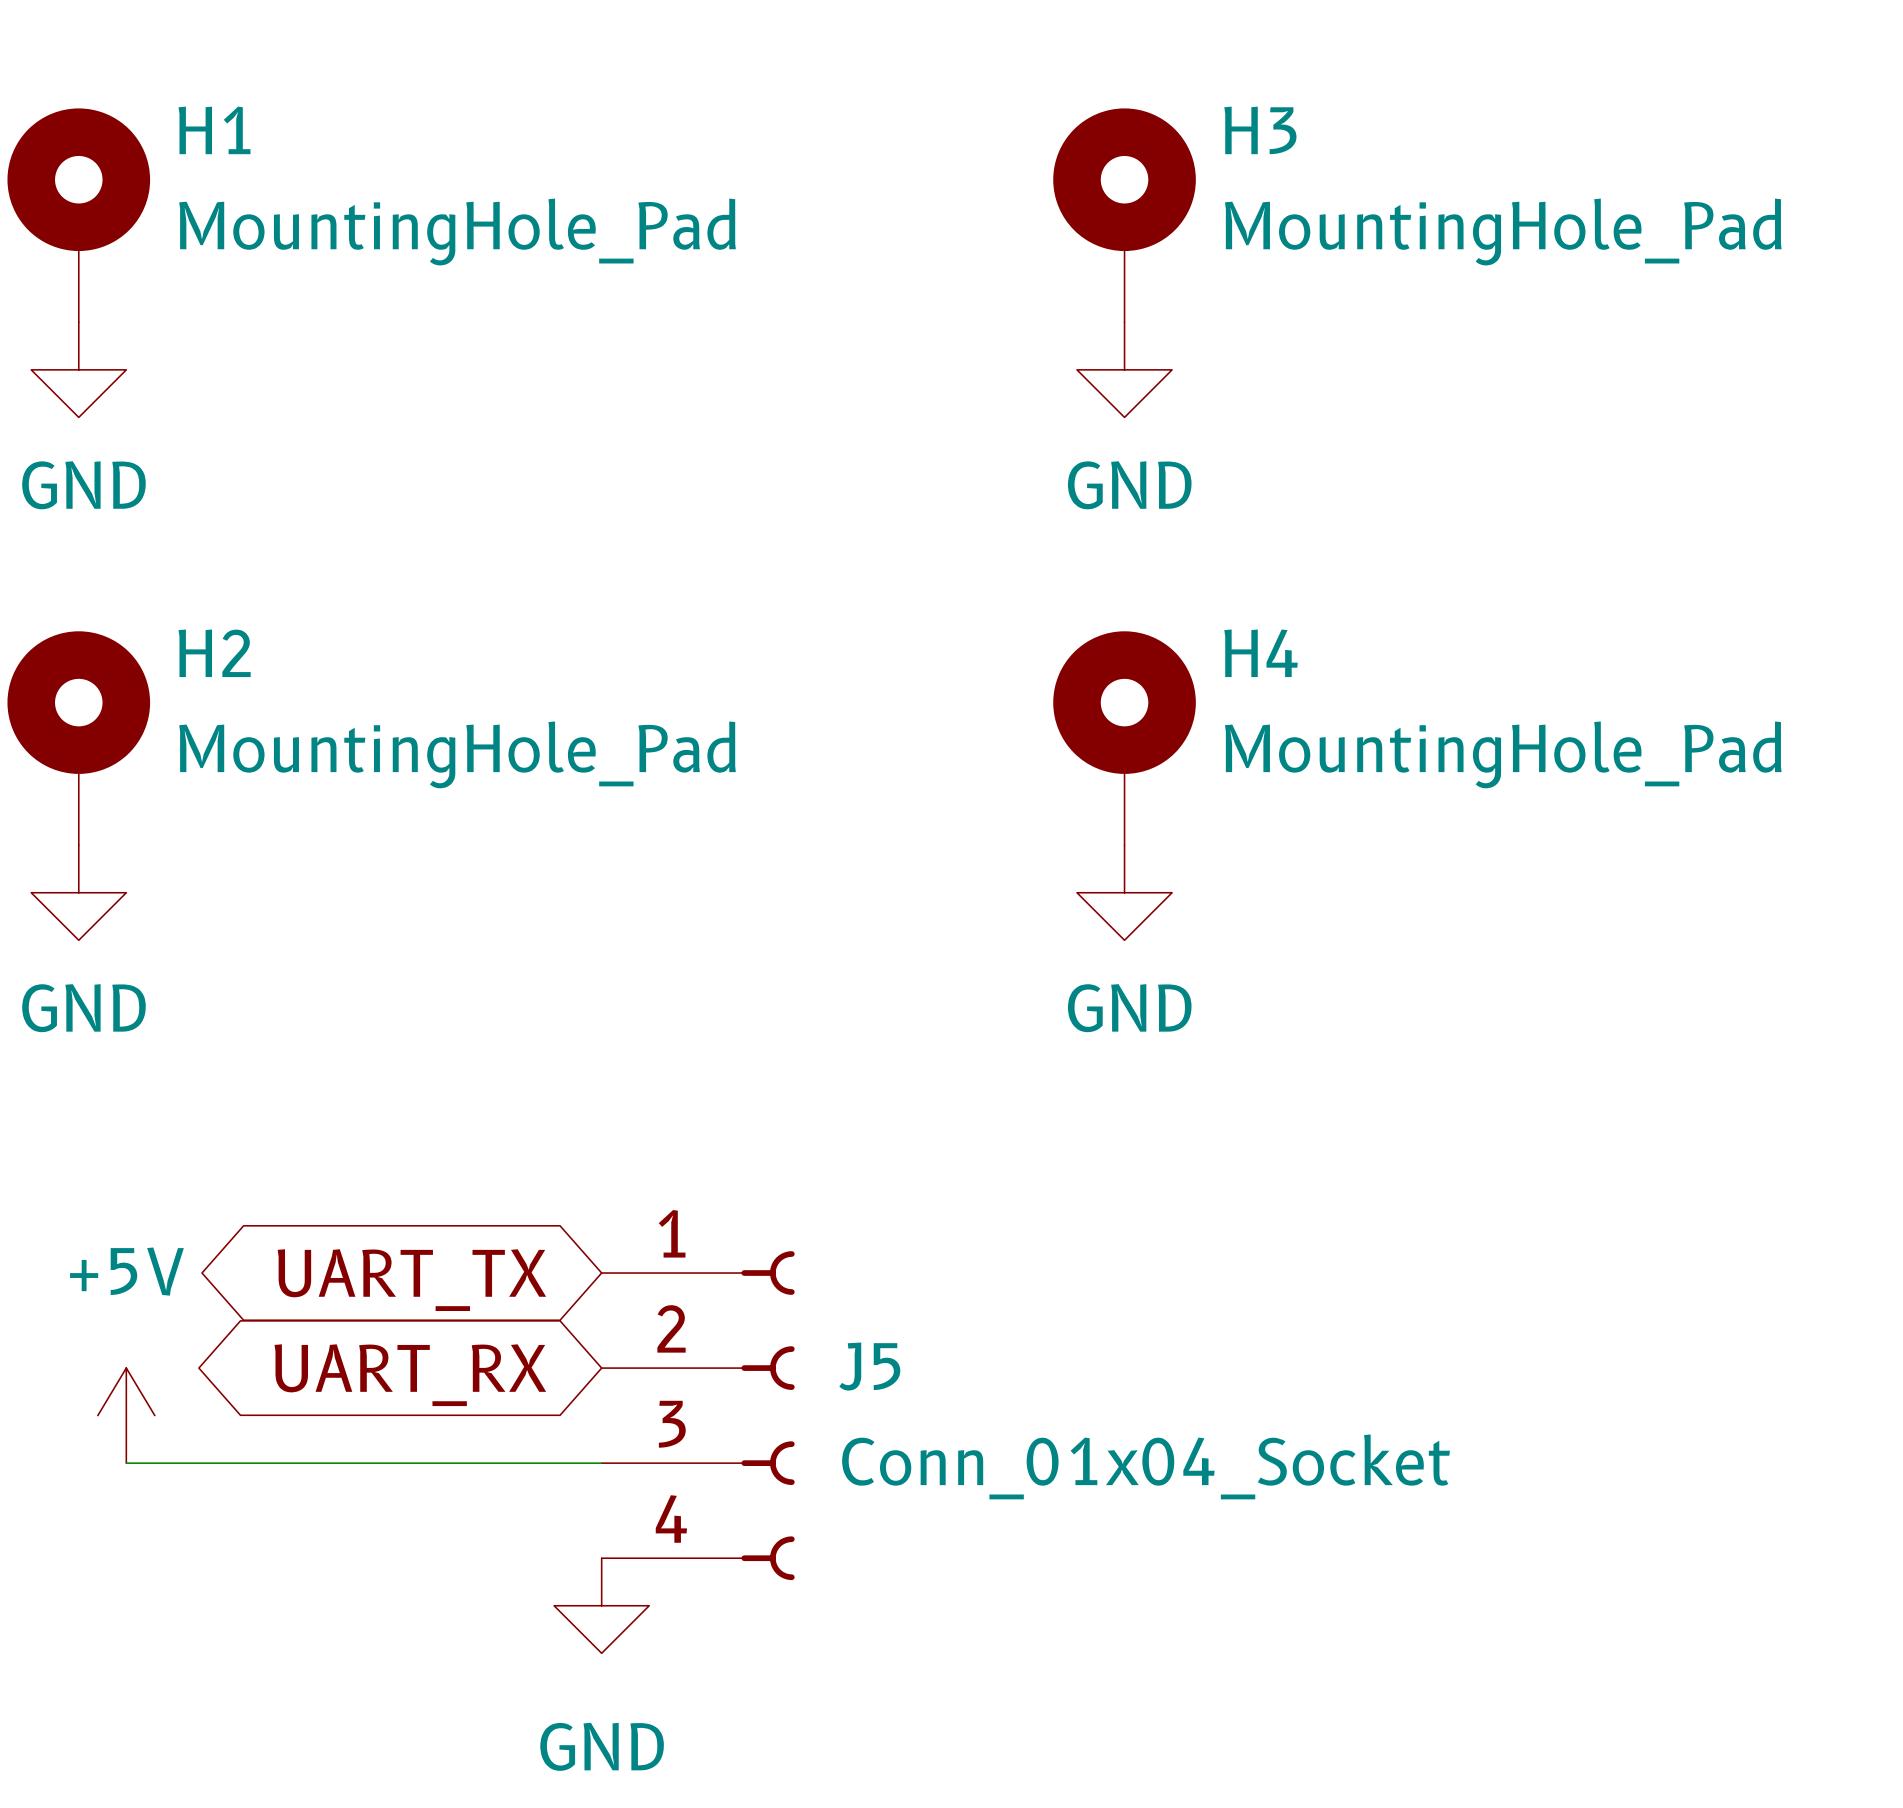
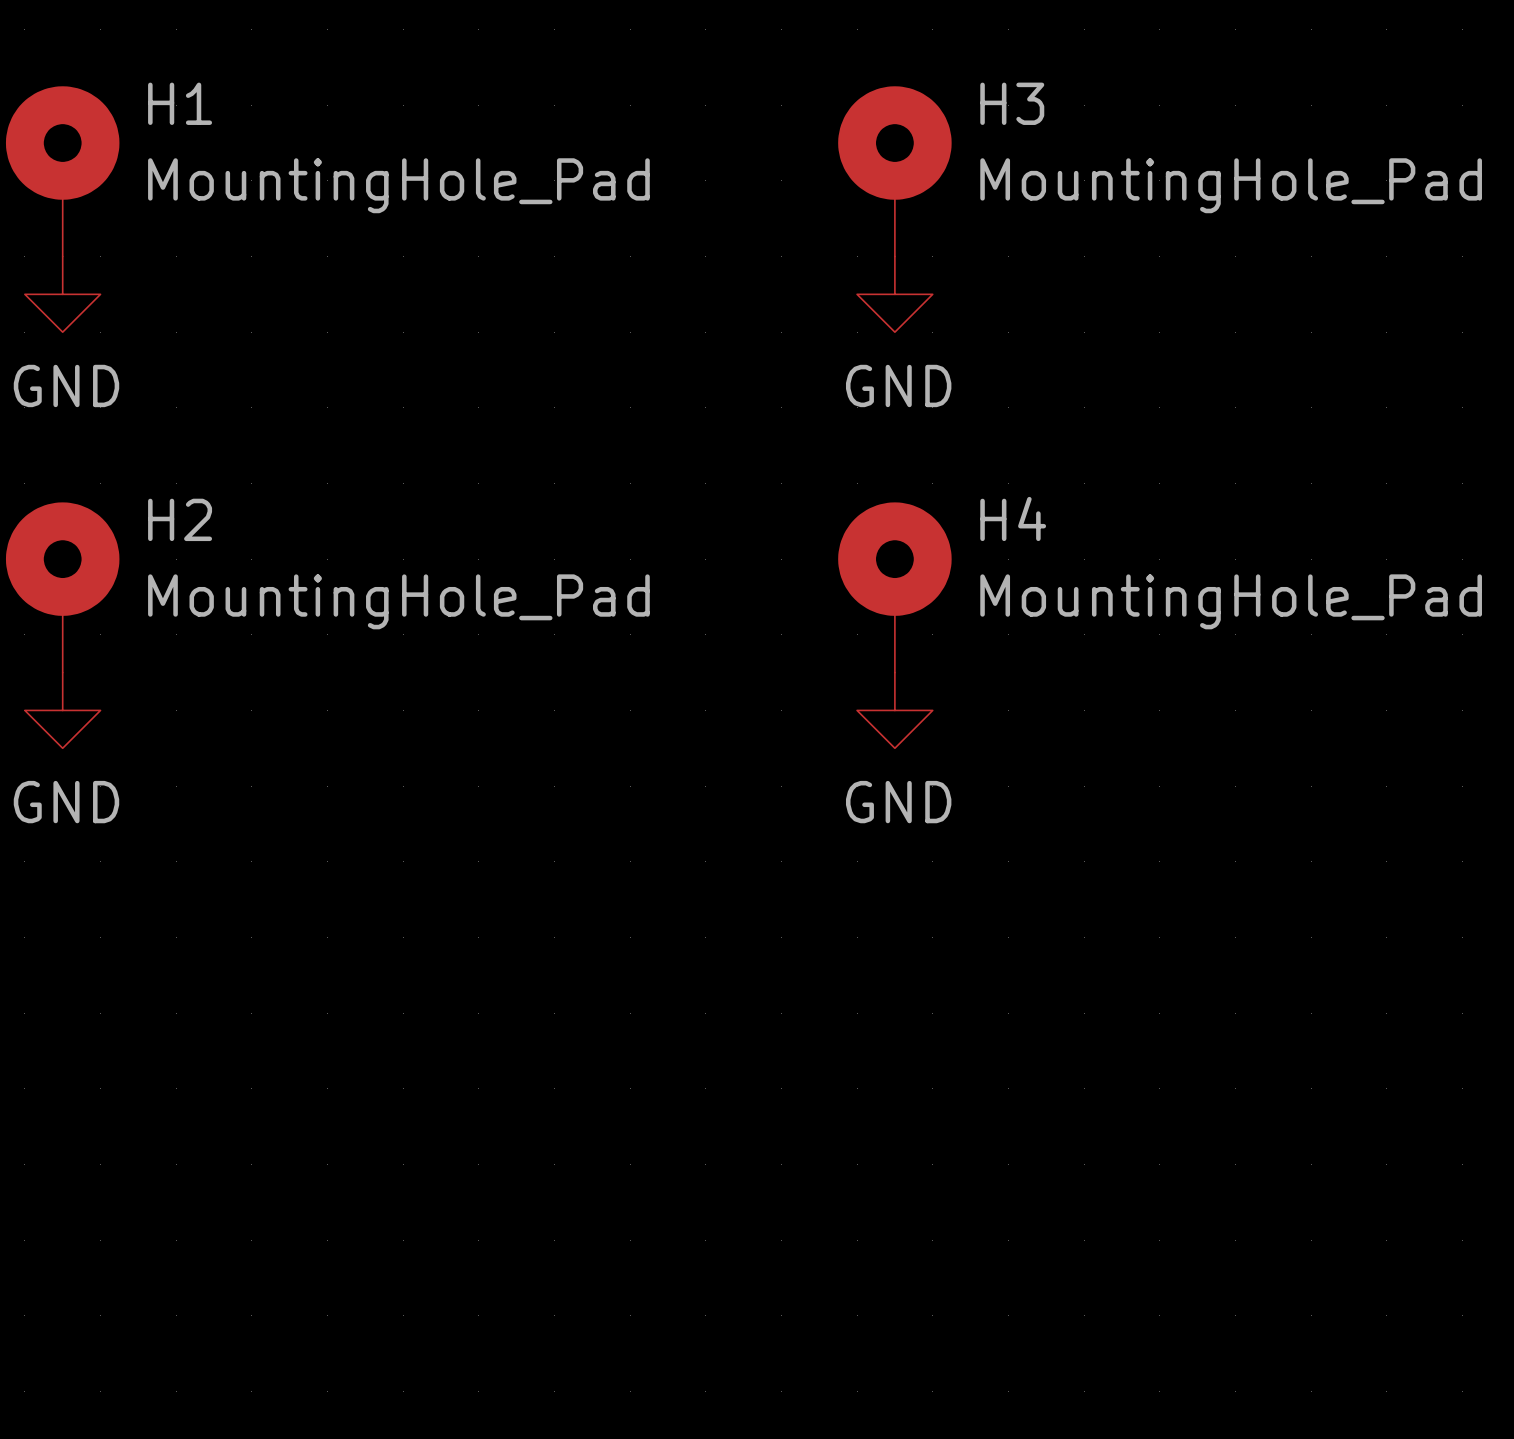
global label: UART_TX (411, 1280) -> none
global label: UART_RX (410, 1375) -> none
power symbol: +5V (126, 1415) -> none
J5: Conn_01x04_Socket (698, 1415) -> none
wire: (126, 1463) (601, 1463) -> none
power symbol: GND (601, 1605) -> none

